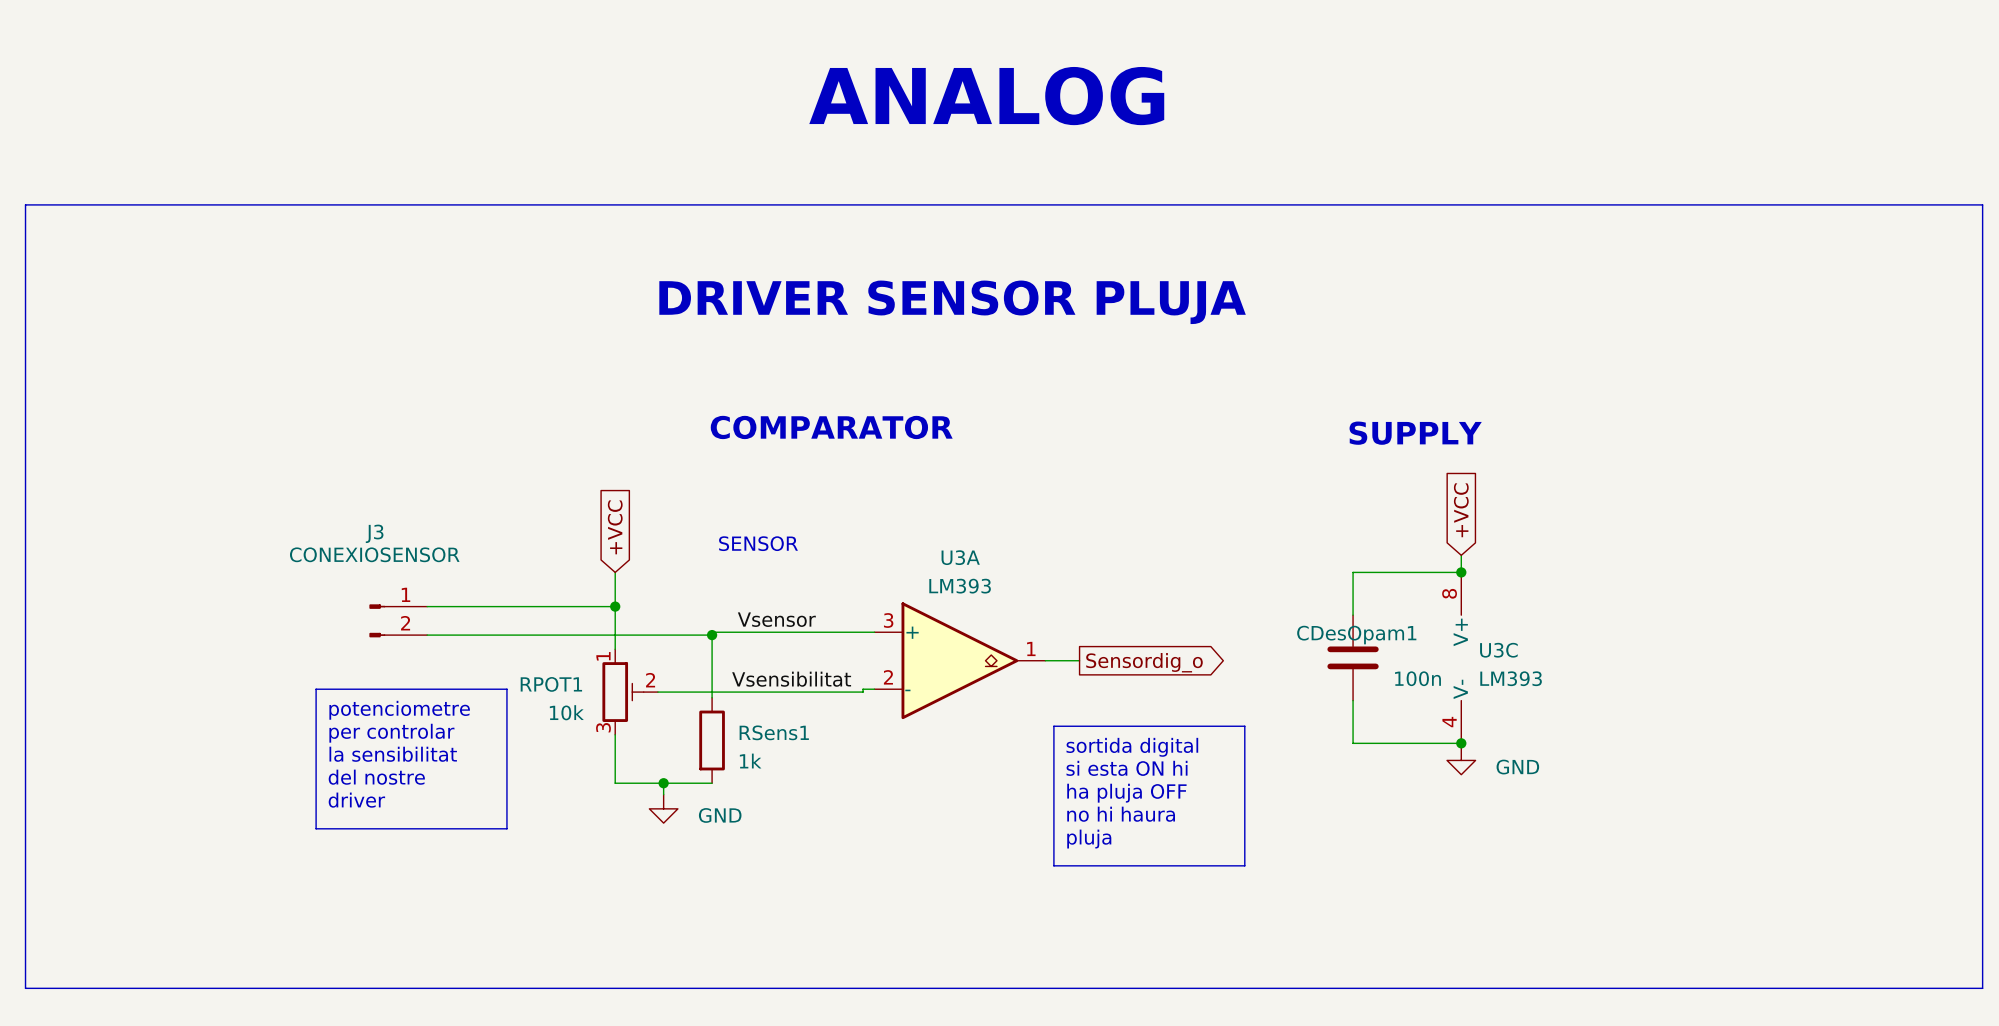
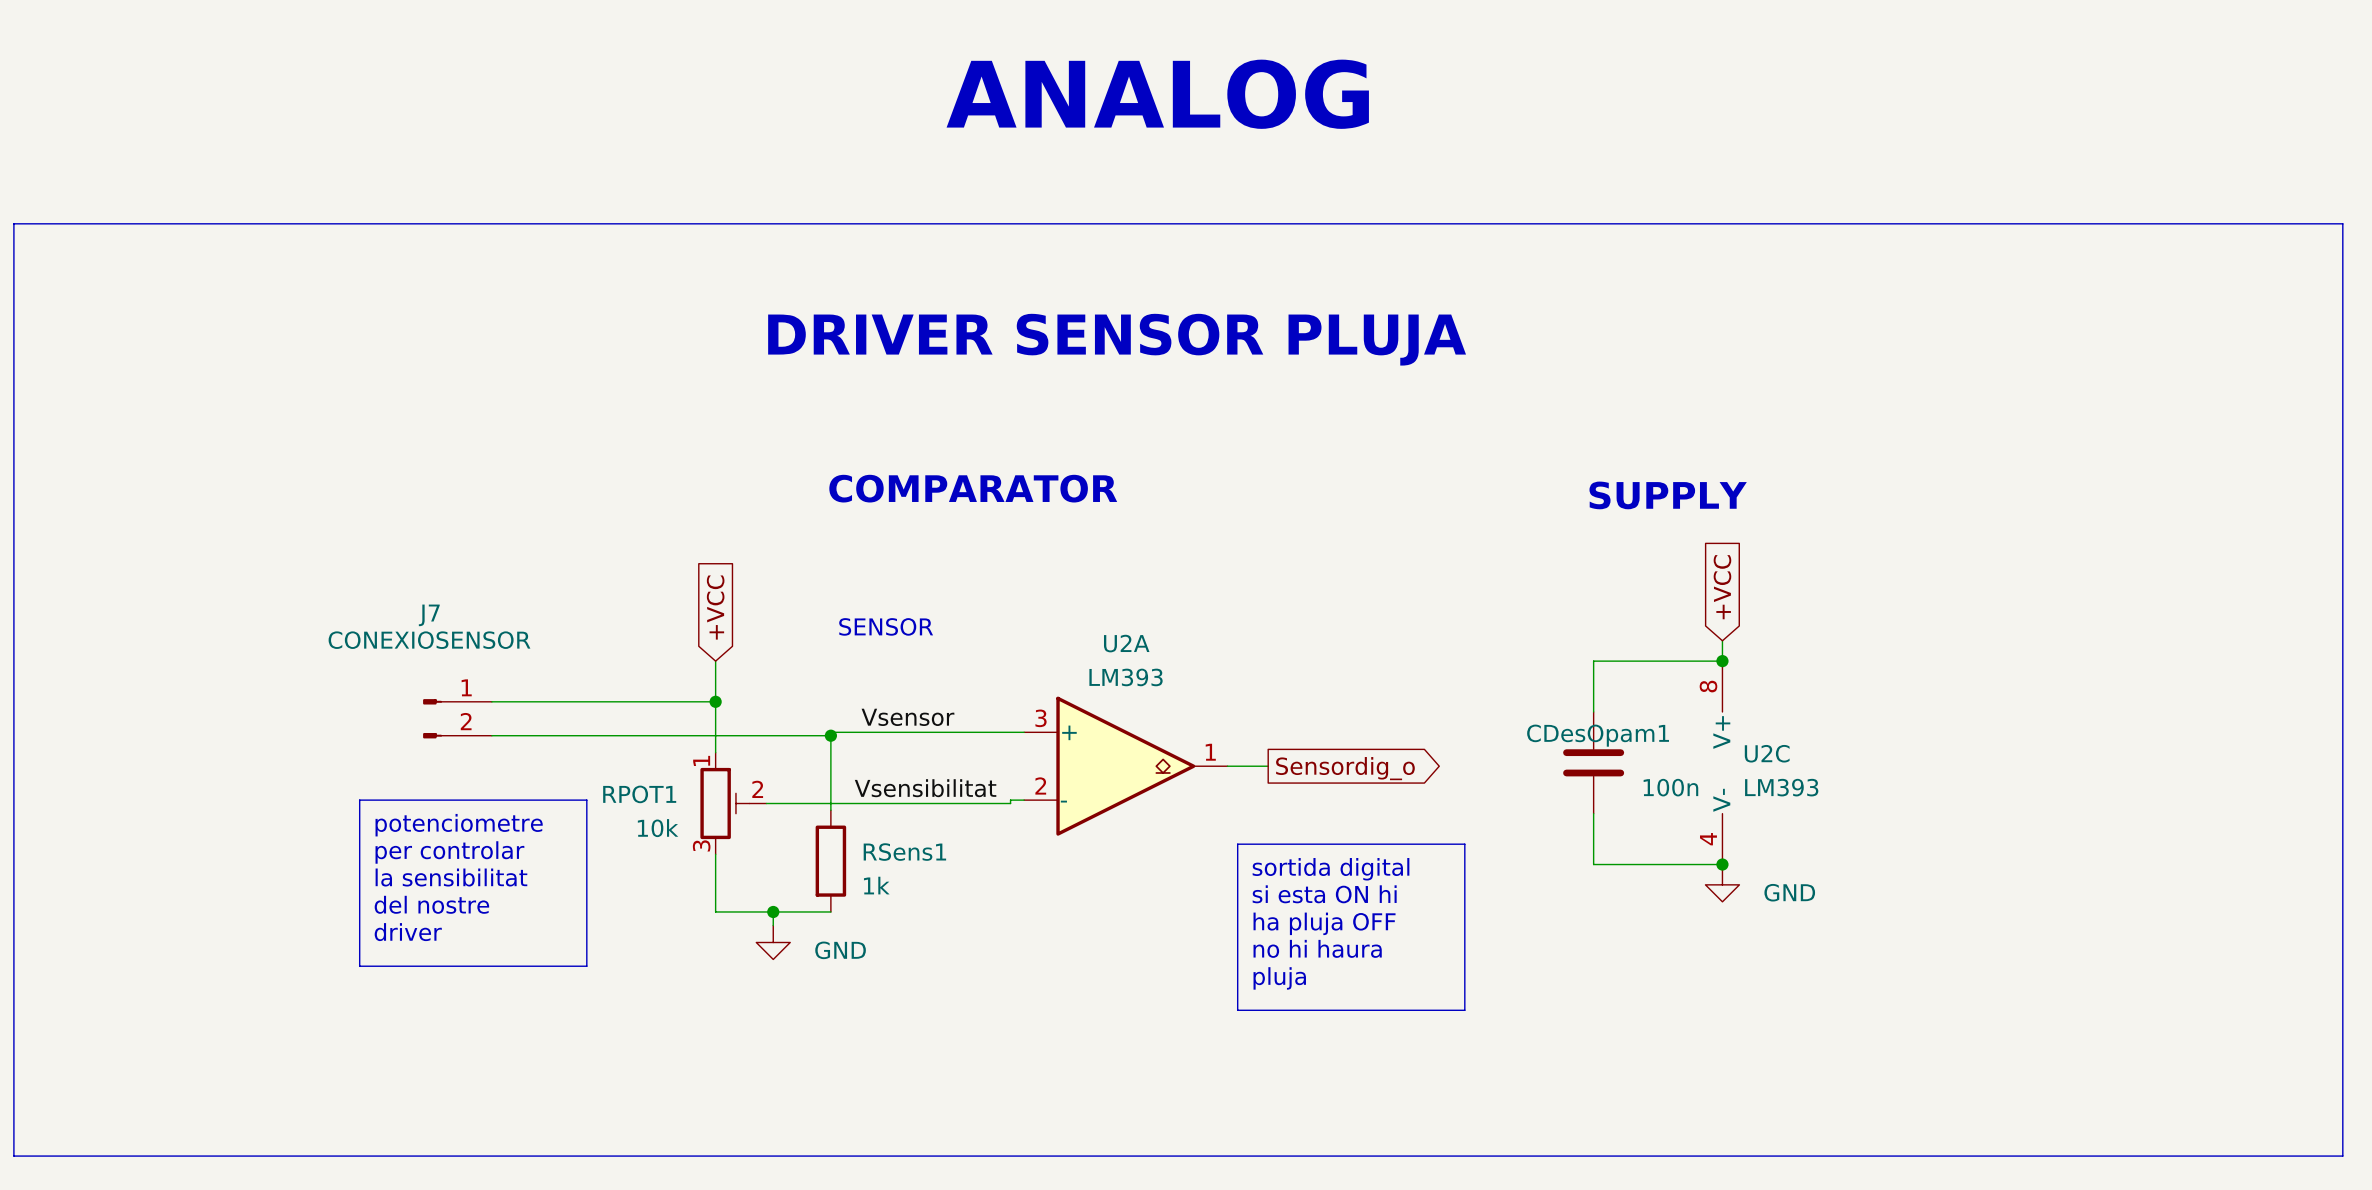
J3 name: J3 (374, 533) -> J7 (429, 615)
U3A name: U3A (960, 557) -> U2A (1126, 643)
U3C name: U3C (1498, 650) -> U2C (1767, 753)

